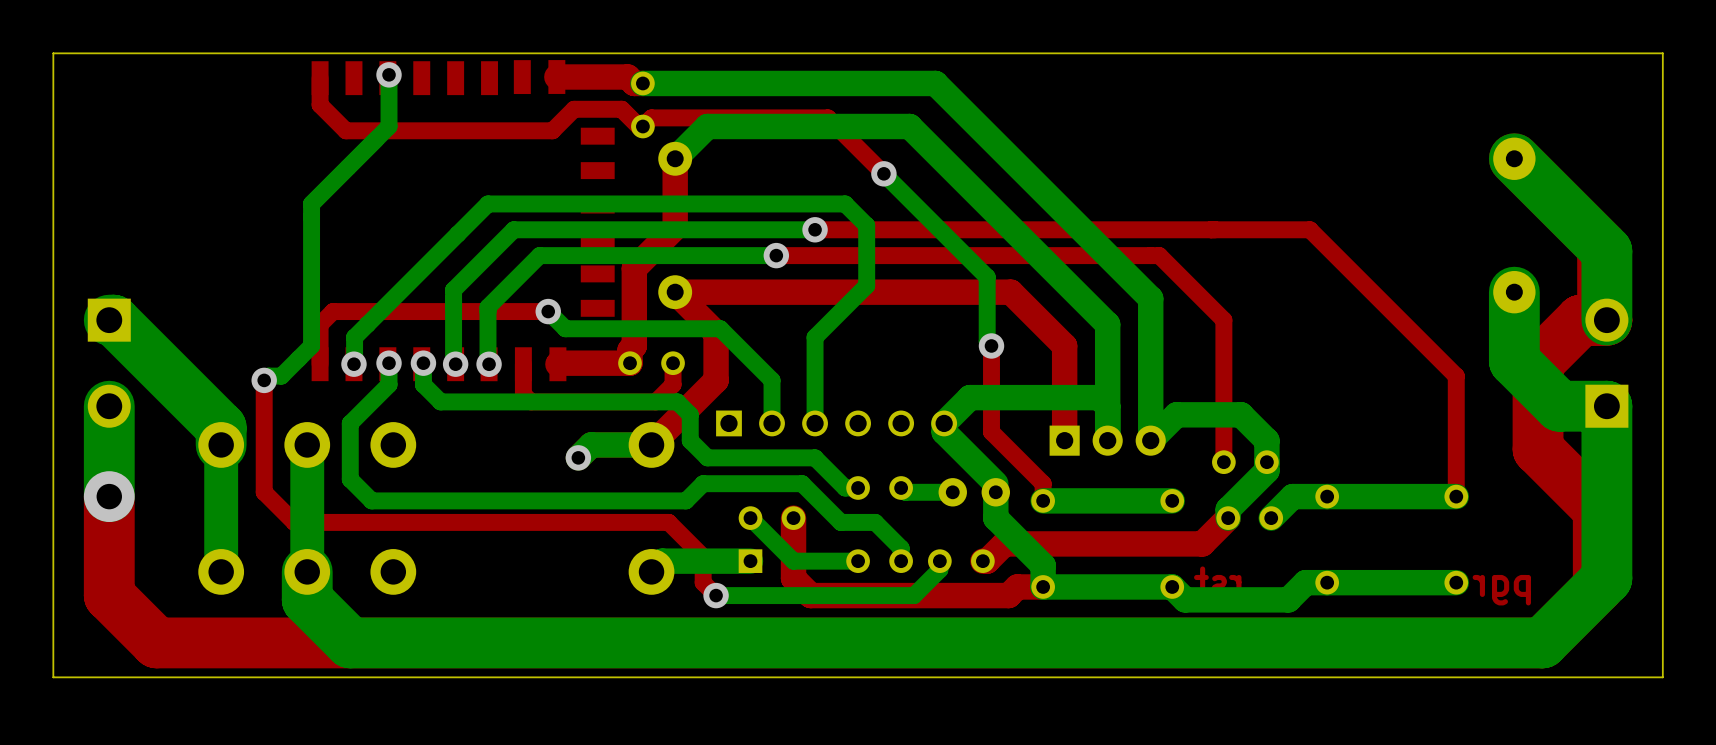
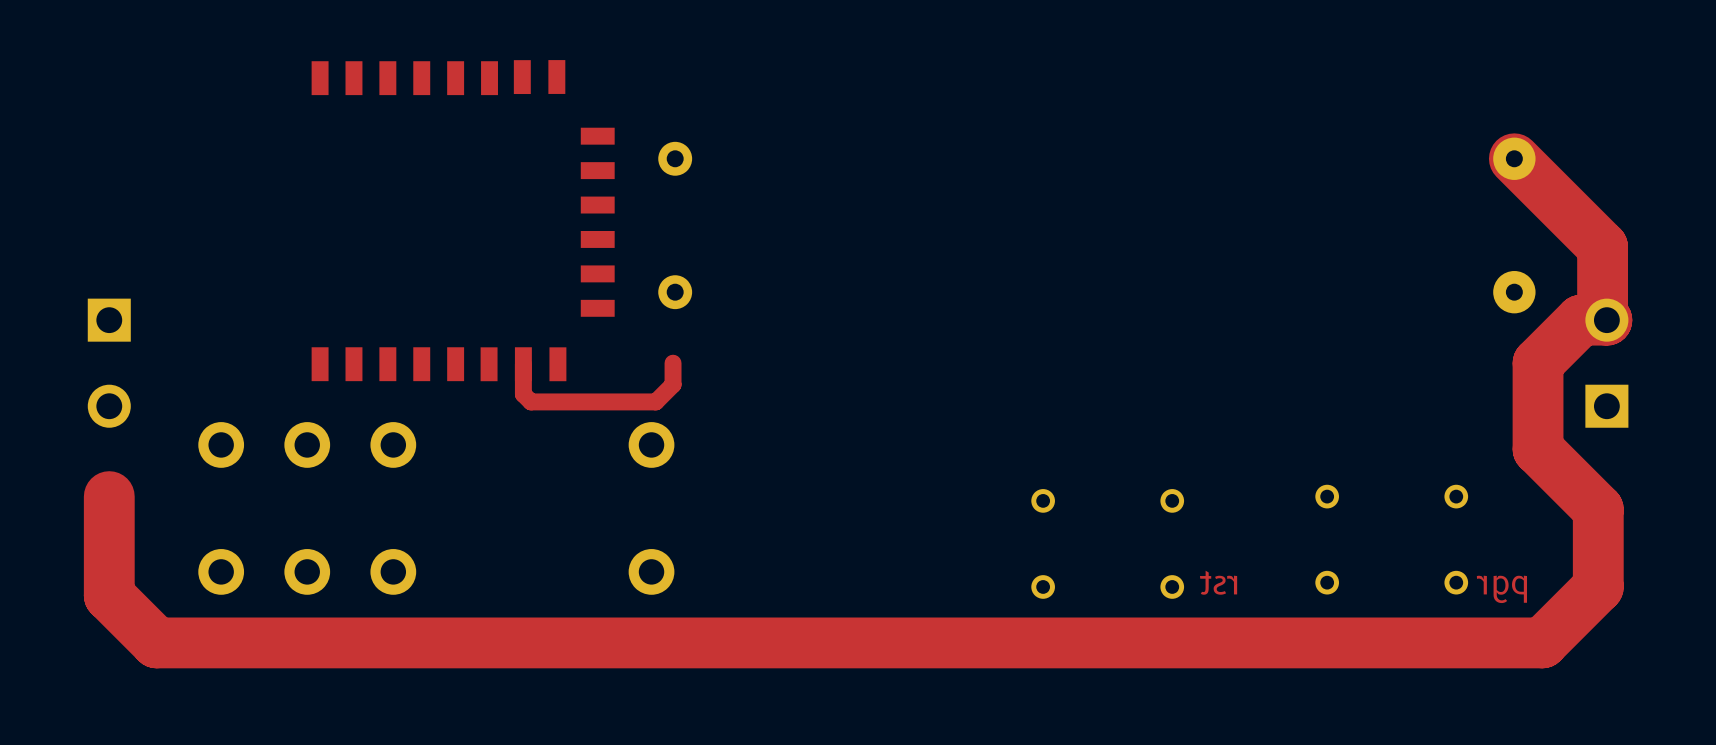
board edge: (1662, 53) (1662, 677) (53, 677) (53, 53) (1662, 53) -> none
bottom track: (389, 74) (389, 126) (311, 203) (311, 345) (281, 376) (268, 376) (264, 380) -> none
via: (389, 74) -> none
top track: (556, 77) (627, 77) (634, 83) (642, 83) -> none
top track: (320, 78) (320, 104) (345, 130) (552, 130) (574, 109) (621, 109) (638, 126) (642, 126) (651, 117) (827, 117) (883, 173) -> none
bottom track: (642, 83) (935, 83) (1150, 298) (1150, 440) (1176, 414) (1241, 414) (1266, 440) (1266, 470) (1228, 509) (1228, 518) -> none
part: (642, 104) -> none
top track: (675, 158) (675, 227) (634, 268) (634, 345) (630, 350) (630, 363) (557, 364) -> none
bottom track: (675, 158) (707, 126) (909, 126) (1107, 324) (1107, 440) -> none
bottom track: (1514, 158) (1606, 251) (1606, 320) -> none
bottom track: (883, 173) (987, 277) (987, 341) (991, 345) -> none
via: (883, 173) -> none
top track: (815, 229) (1309, 229) (1456, 376) (1456, 496) -> none
bottom track: (815, 229) (513, 229) (453, 290) (453, 362) (455, 364) -> none
via: (815, 229) -> none
top track: (776, 255) (1159, 255) (1223, 320) (1223, 462) -> none
bottom track: (776, 255) (539, 255) (487, 307) (489, 364) -> none
via: (776, 255) -> none
bottom track: (1514, 292) (1514, 361) (1559, 406) (1606, 406) (1606, 578) (1542, 642) (350, 642) (307, 599) (307, 444) -> none
top track: (548, 311) (333, 311) (320, 324) (320, 364) -> none
bottom track: (548, 311) (565, 328) (720, 328) (772, 380) (772, 423) -> none
via: (548, 311) -> none
bottom track: (109, 320) (113, 320) (221, 427) (221, 571) -> none
top track: (991, 345) (991, 432) (1043, 483) (1043, 500) -> none
via: (991, 345) -> none
bottom track: (389, 363) (389, 384) (350, 423) (350, 479) (371, 500) (685, 500) (703, 483) (802, 483) (840, 522) (875, 522) (901, 548) (901, 561) -> none
via: (389, 363) -> none
bottom track: (423, 363) (423, 384) (440, 401) (677, 401) (690, 414) (690, 440) (707, 457) (815, 457) (845, 487) (858, 487) -> none
via: (423, 363) -> none
part: (651, 363) -> none
bottom track: (353, 364) (354, 337) (487, 203) (845, 203) (866, 225) (866, 285) (815, 337) (815, 423) -> none
via: (353, 364) -> none
via: (455, 364) -> none
via: (489, 364) -> none
top track: (264, 380) (264, 492) (294, 522) (668, 522) (703, 556) (703, 582) (716, 595) -> none
via: (264, 380) -> none
bottom track: (109, 406) (109, 496) -> none
bottom track: (1107, 406) (1099, 397) (969, 397) (944, 423) (944, 432) (995, 483) (995, 518) (1043, 565) (1043, 586) (1172, 586) (1185, 599) (1288, 599) (1305, 582) (1456, 582) -> none
part: (836, 423) -> none
top track: (1064, 440) (1064, 345) (1010, 292) (675, 292) (716, 333) (716, 380) (651, 444) (591, 444) (578, 457) -> none
part: (1107, 440) -> none
bottom track: (651, 444) (591, 444) (578, 457) -> none
via: (578, 457) -> none
part: (1245, 462) -> none
part: (879, 487) -> none
bottom track: (901, 487) (905, 492) (952, 492) -> none
part: (974, 492) -> none
via: (109, 496) -> none
bottom track: (1456, 496) (1292, 496) (1271, 518) -> none
bottom track: (1172, 500) (1043, 500) -> none
bottom track: (750, 518) (793, 561) (858, 561) -> none
top track: (793, 518) (793, 578) (810, 595) (1008, 595) (1017, 586) (1043, 586) -> none
top track: (1228, 518) (1202, 543) (1004, 543) (987, 561) (982, 561) -> none
part: (1249, 518) -> none
part: (772, 539) -> none
bottom track: (750, 561) (662, 561) (651, 571) -> none
part: (879, 561) -> none
bottom track: (939, 561) (939, 569) (914, 595) (716, 595) -> none
part: (961, 561) -> none
via: (716, 595) -> none

